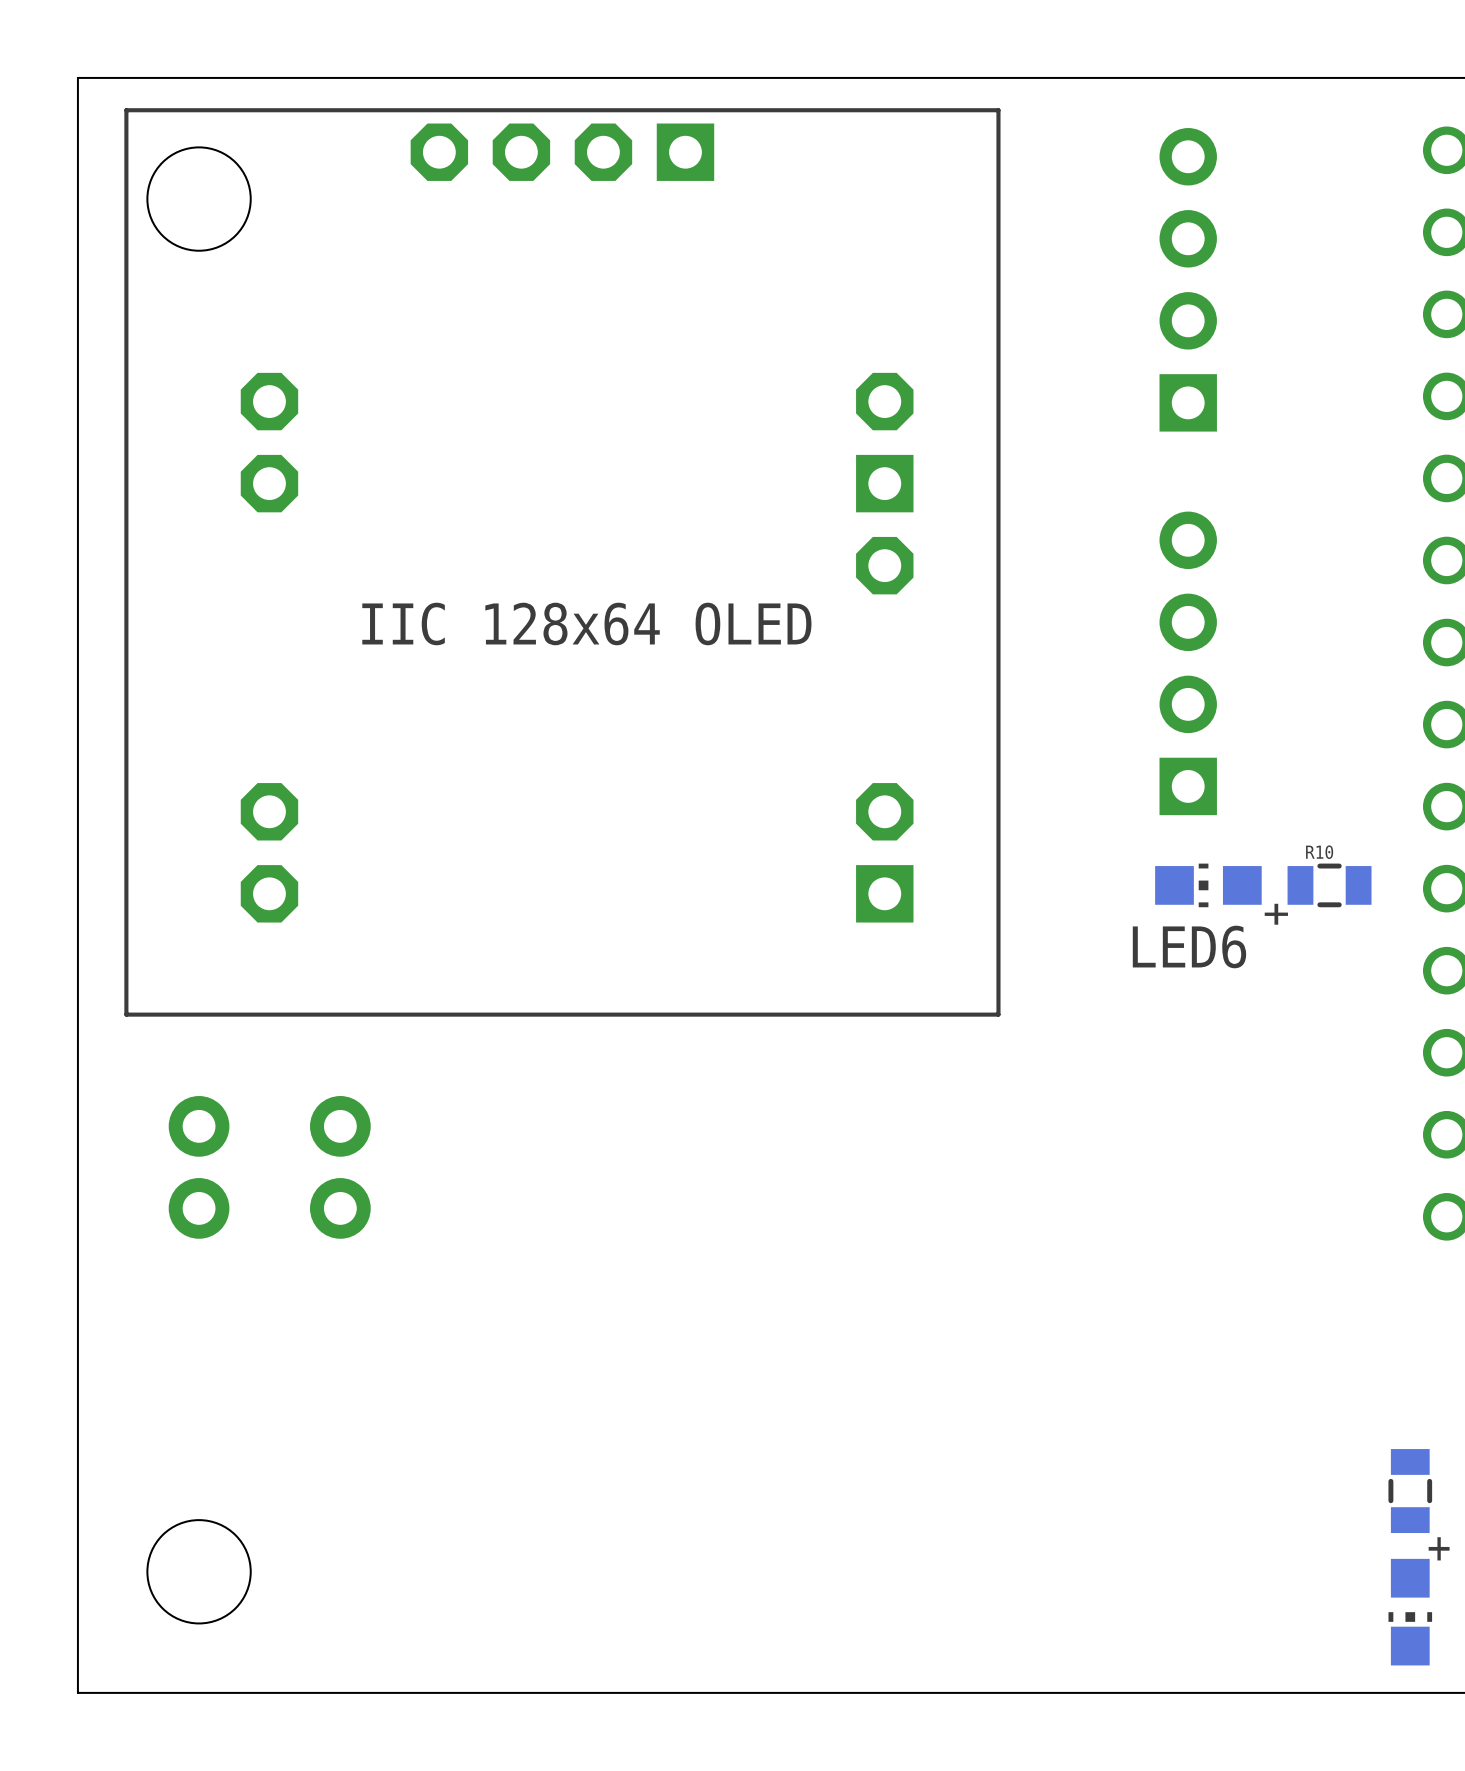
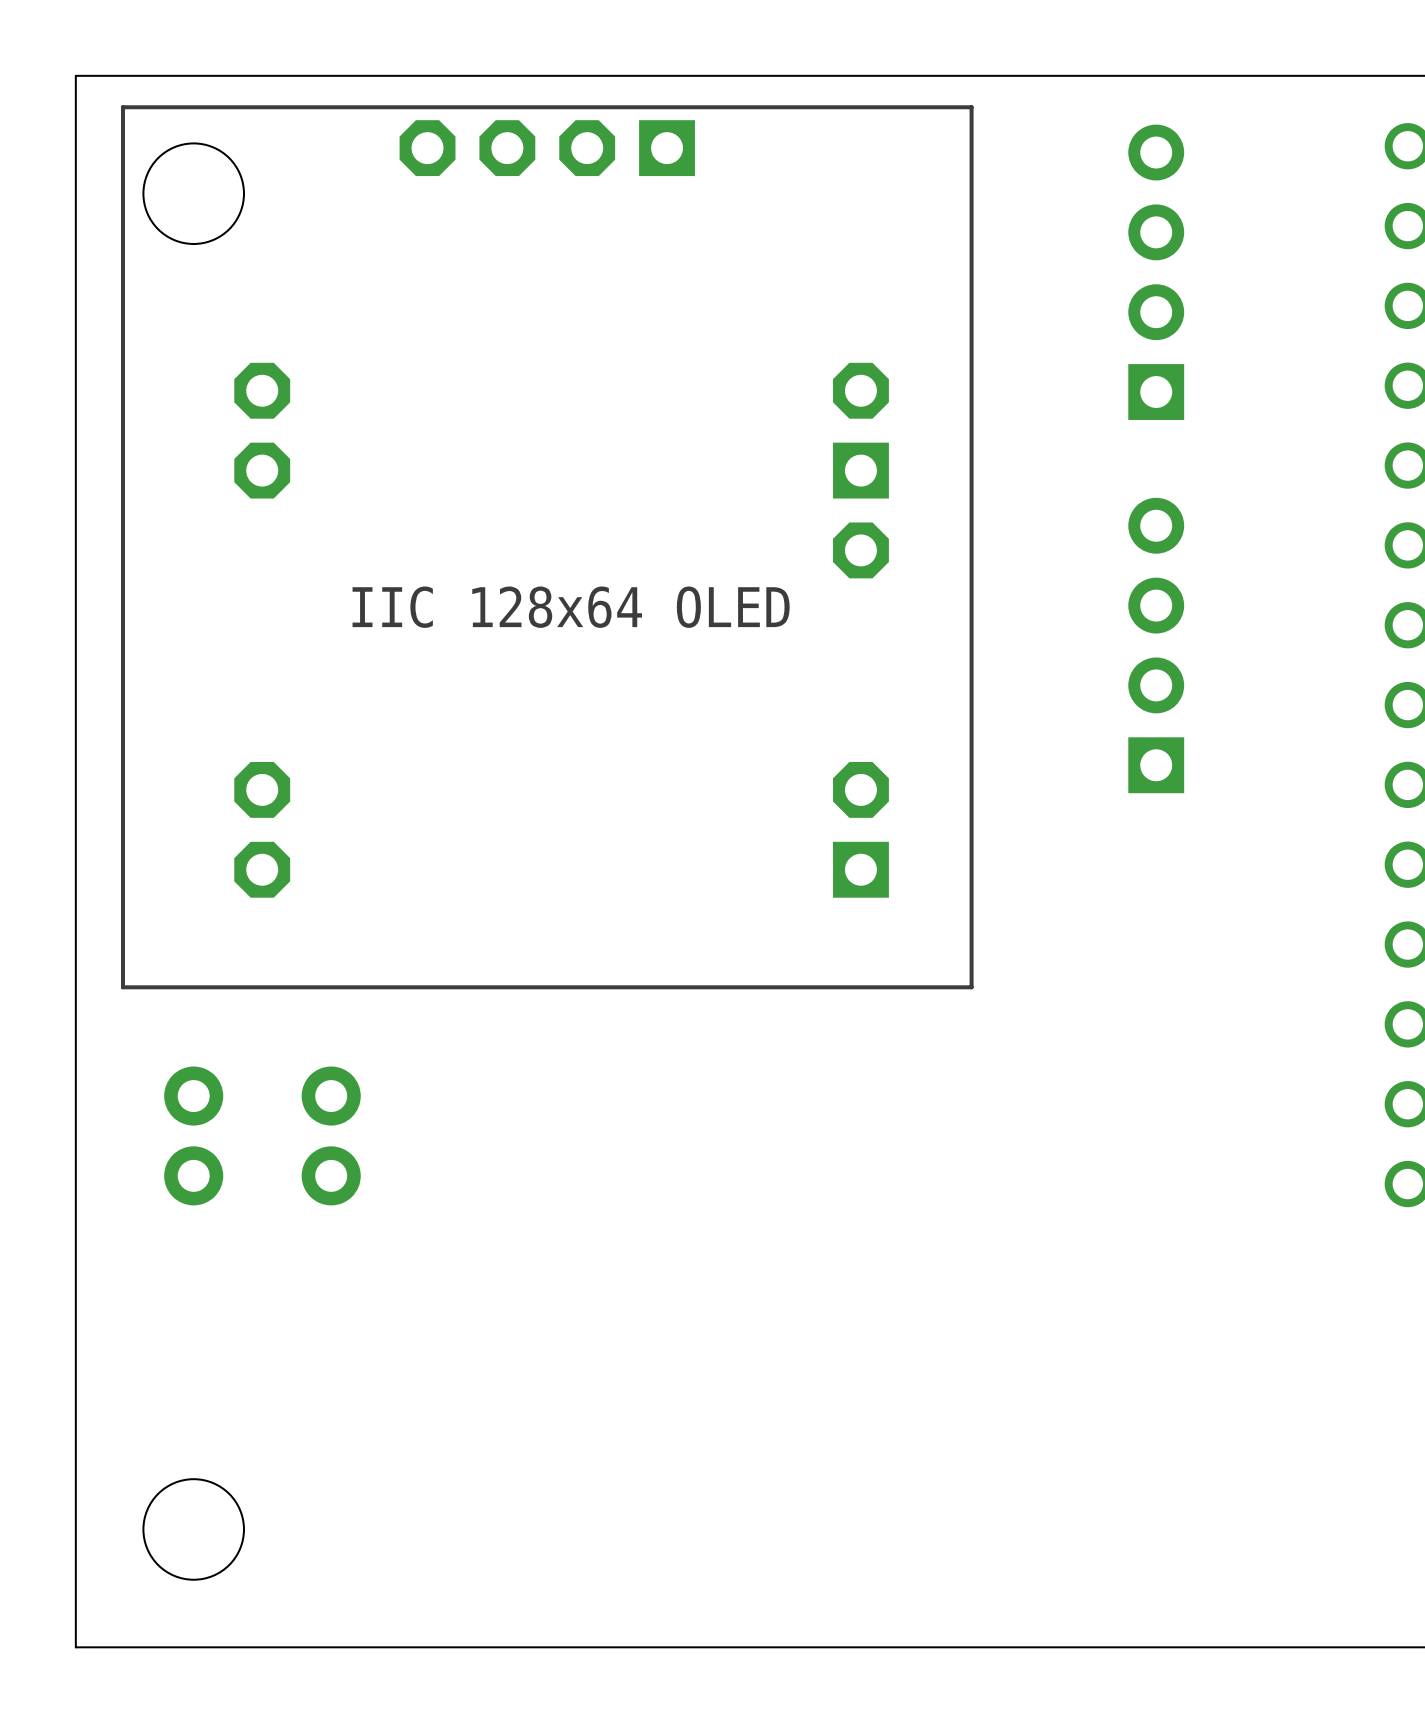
LED6: (1208, 885) -> none
R10: (1329, 885) -> none
part: (1410, 1491) -> none
part: (1410, 1612) -> none

